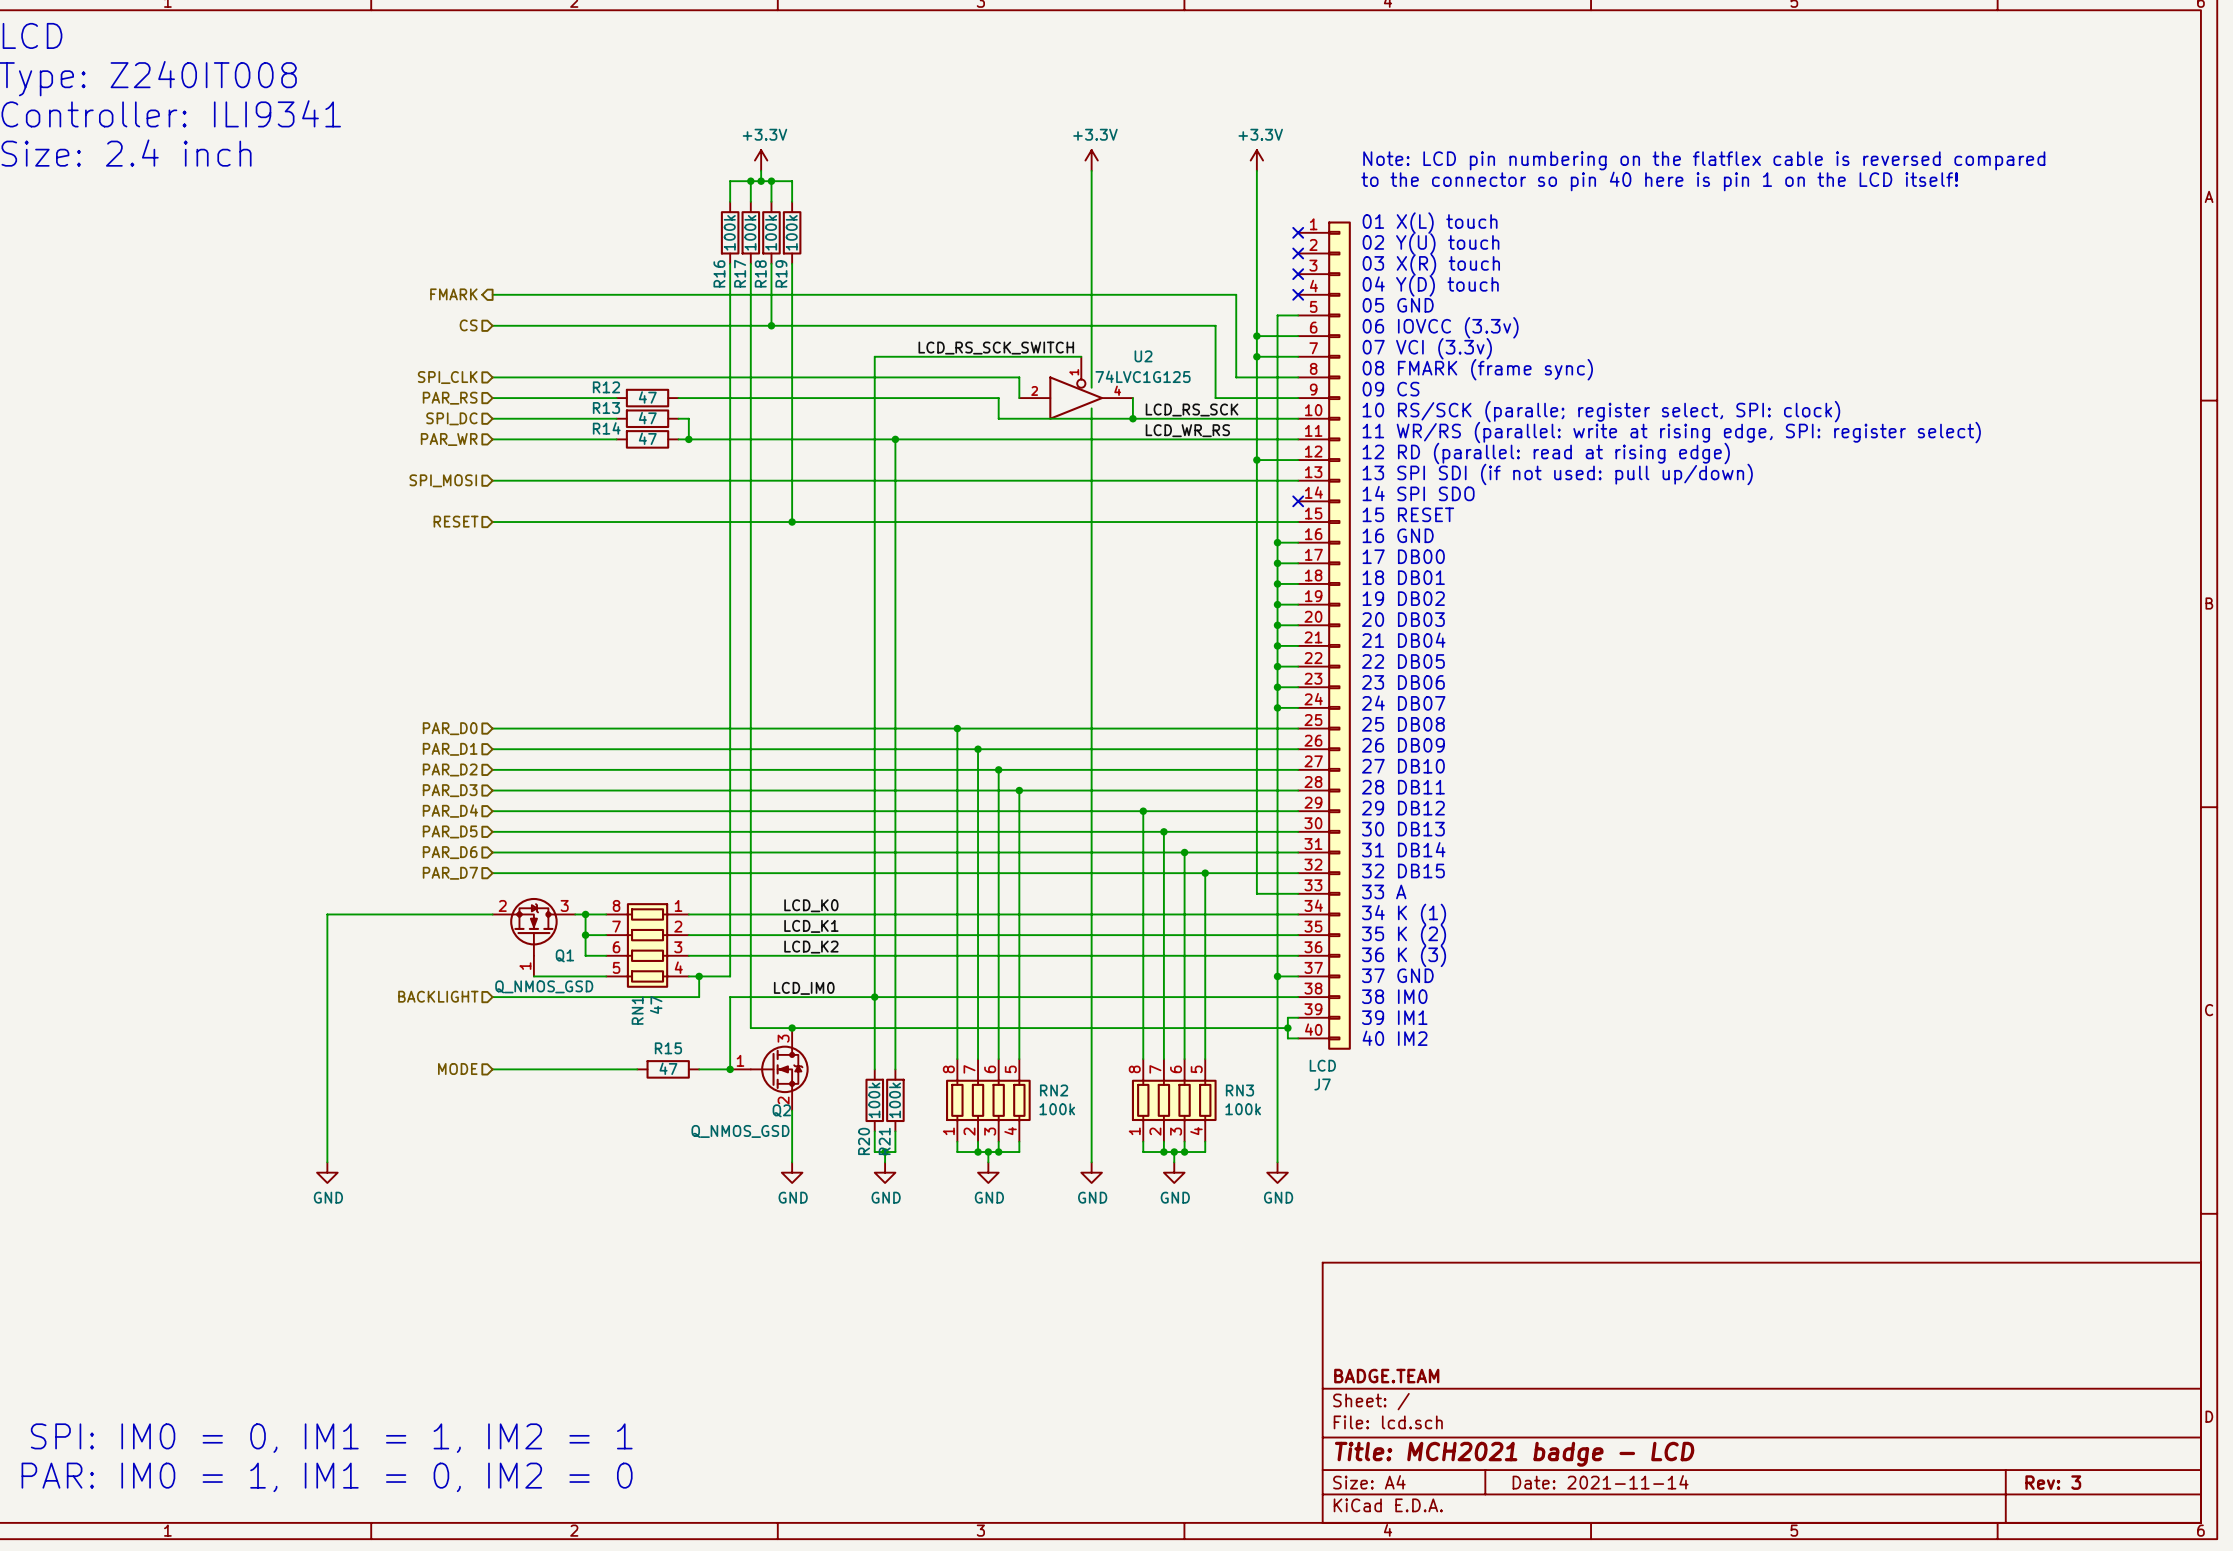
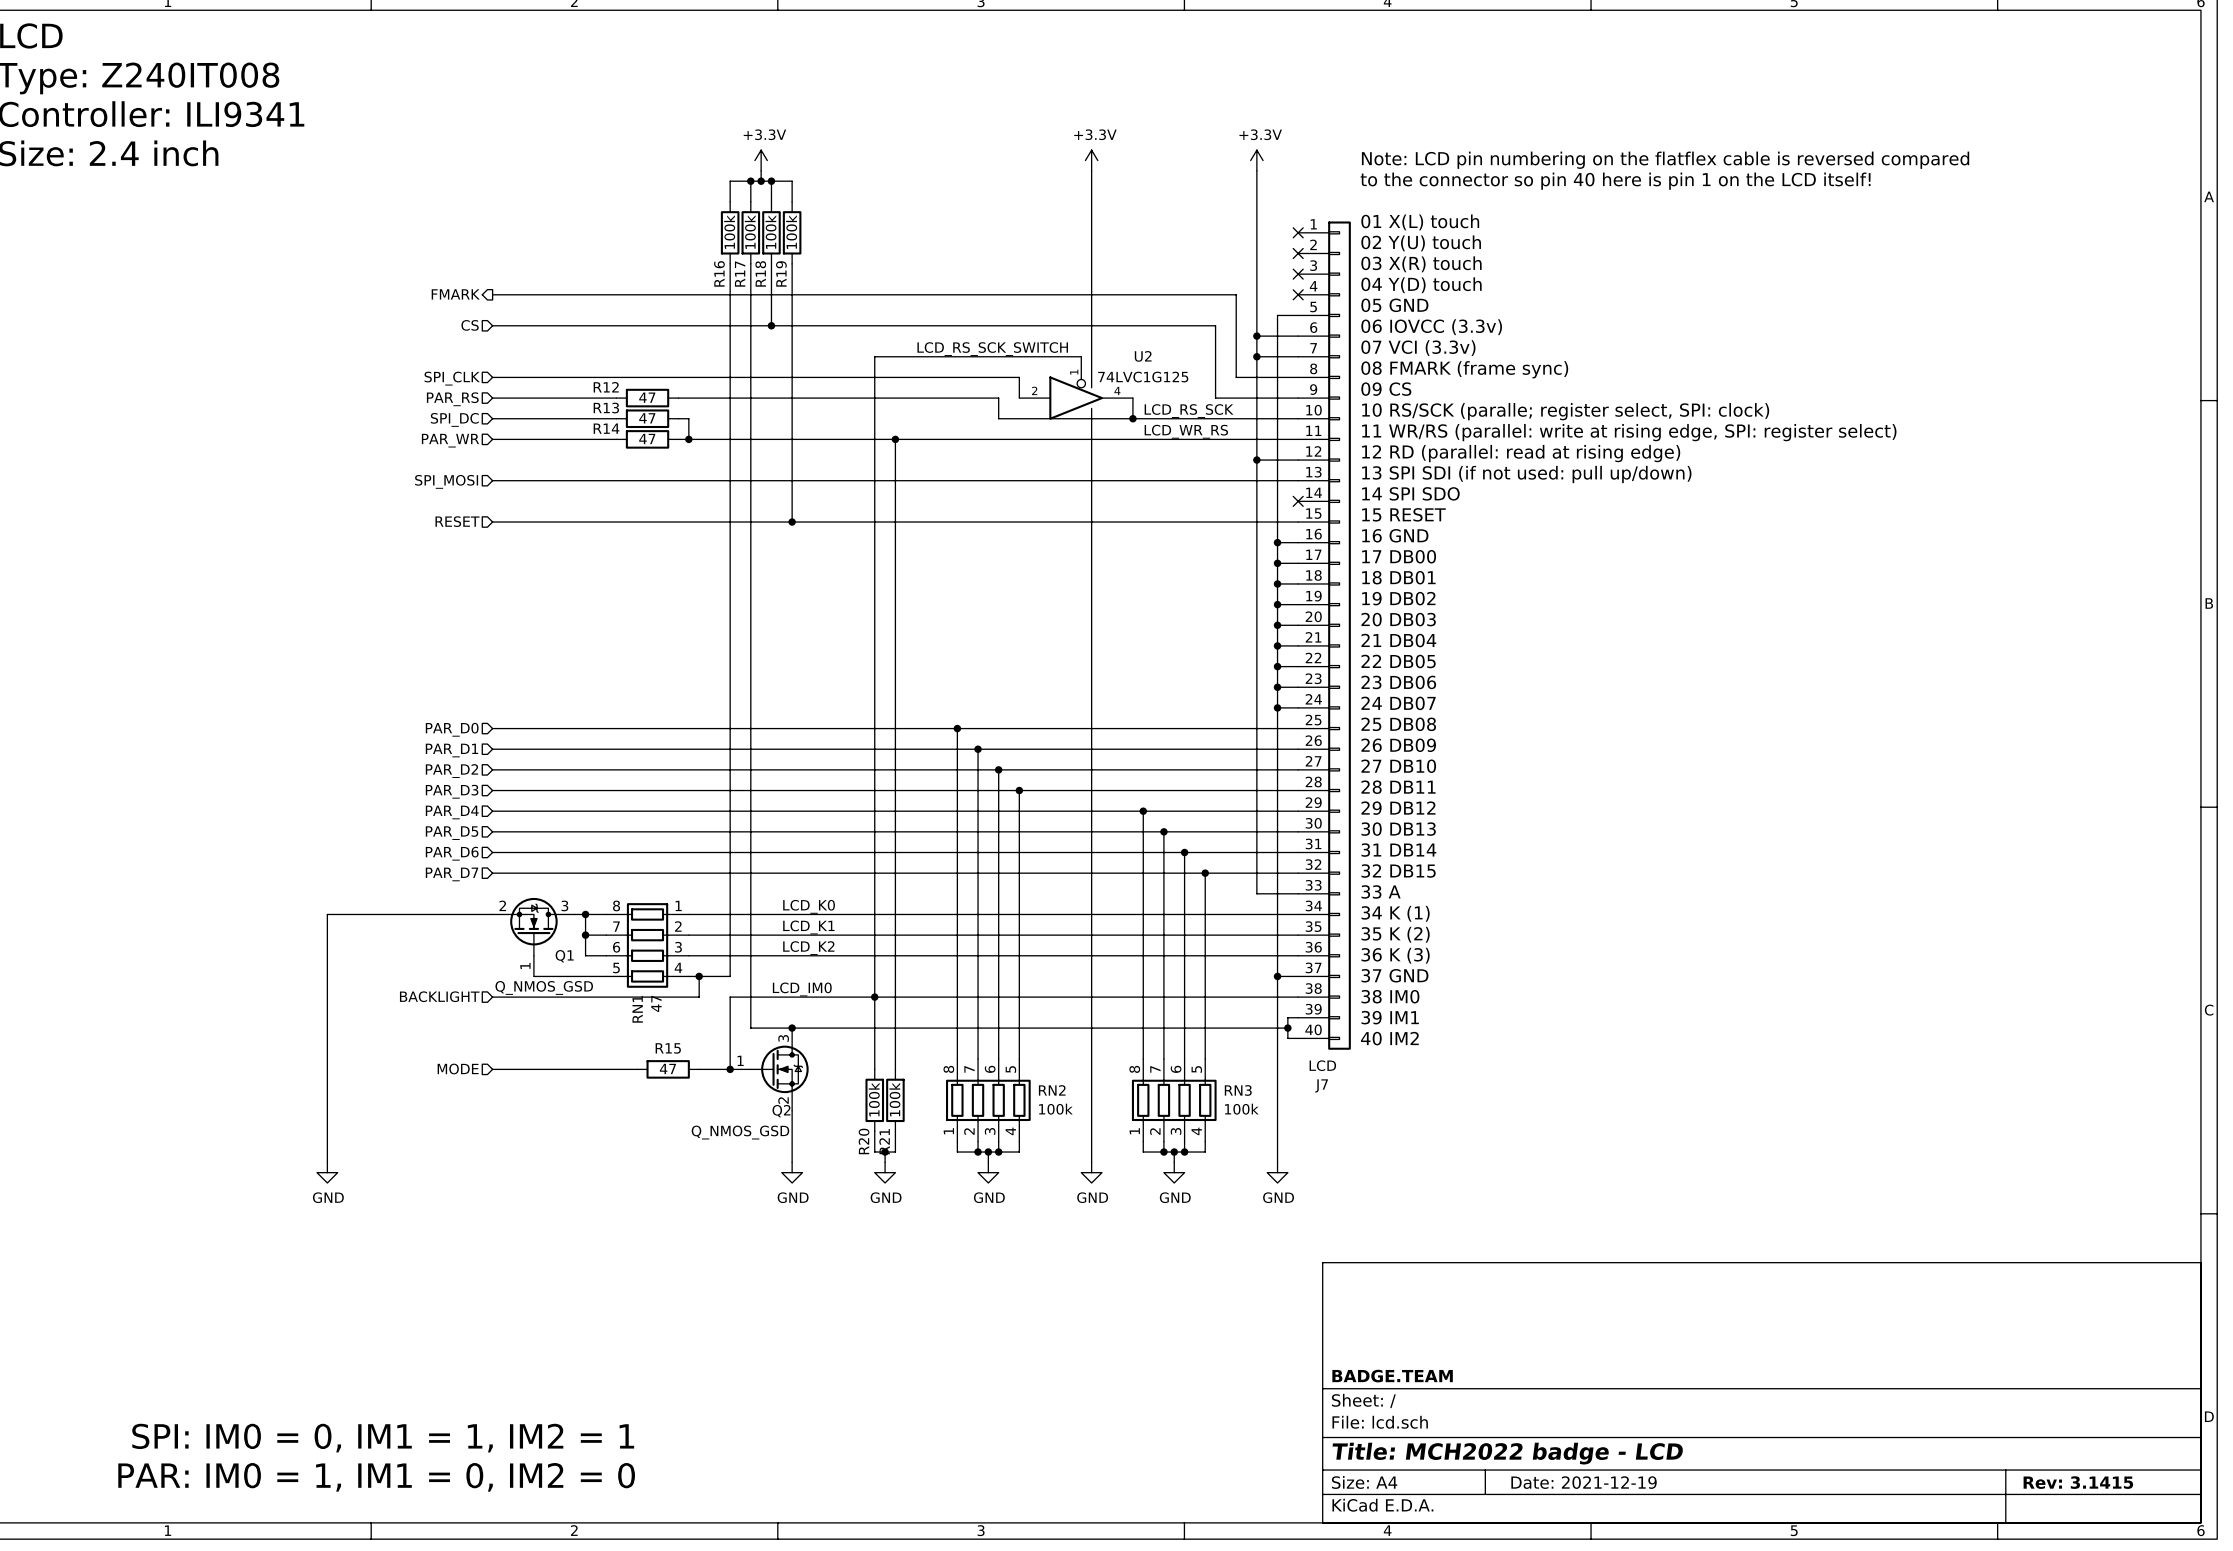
title block: Title: MCH2021 badge - LCD (1514, 1454) -> Title: MCH2022 badge - LCD (1507, 1453)
title block: Date: 2021-11-14 (1600, 1482) -> Date: 2021-12-19 (1584, 1482)
title block: Rev: 3 (2053, 1482) -> Rev: 3.1415 (2078, 1482)

